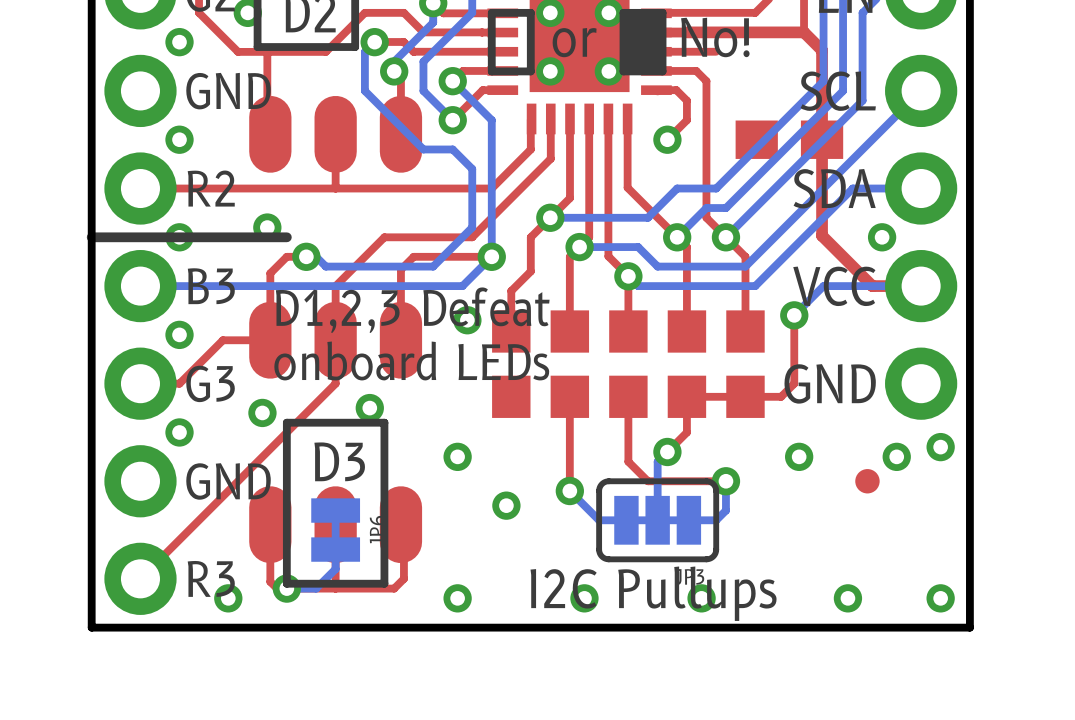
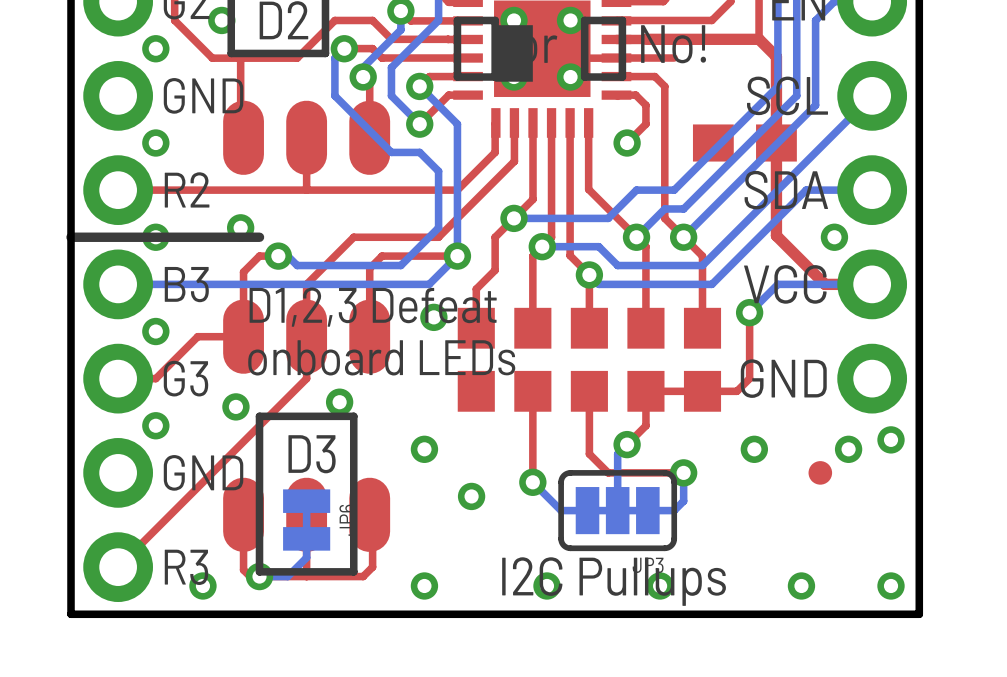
drawing position: (643, 42) -> (513, 53)

